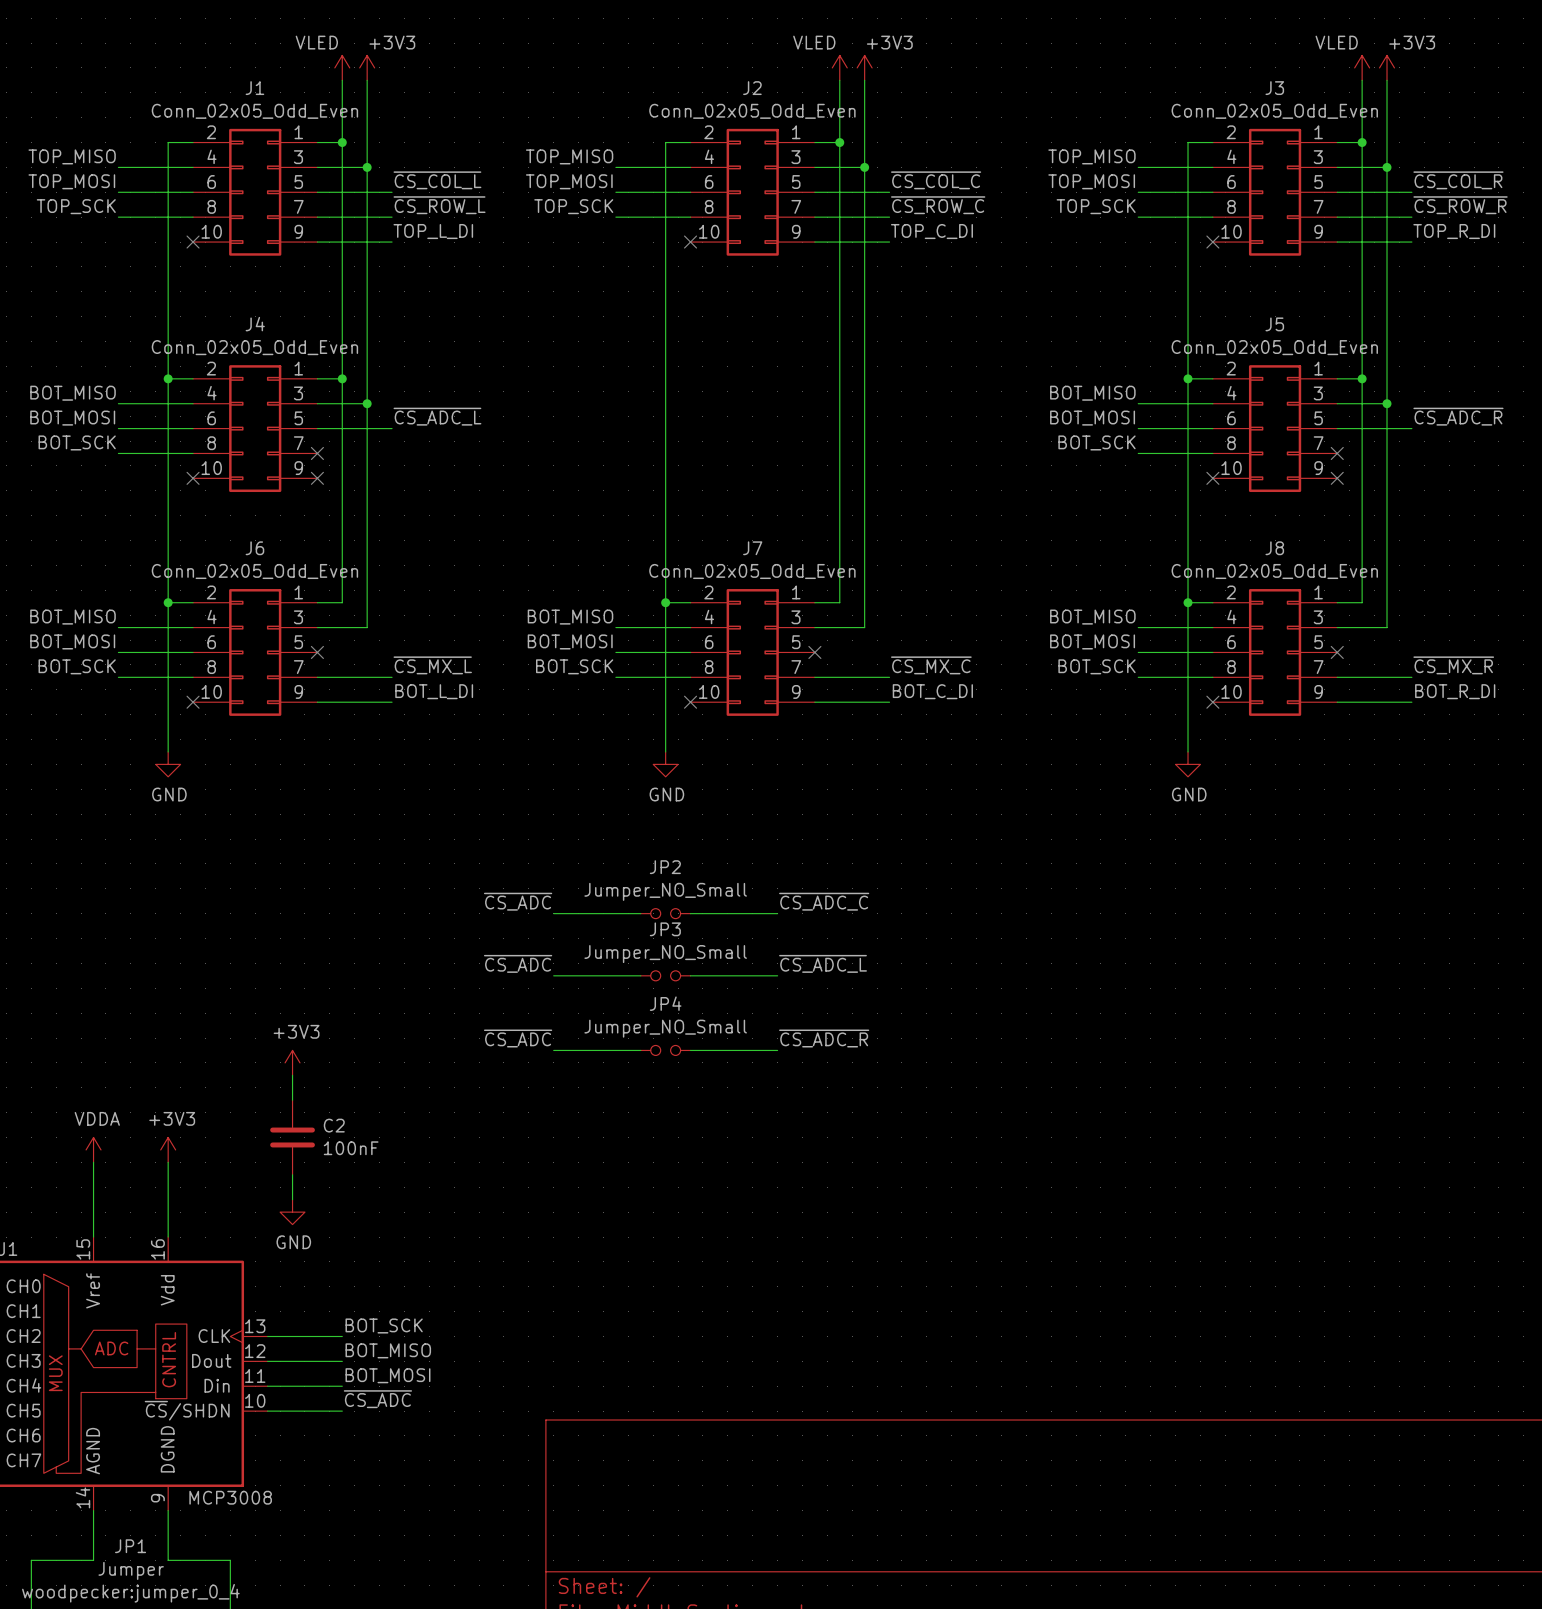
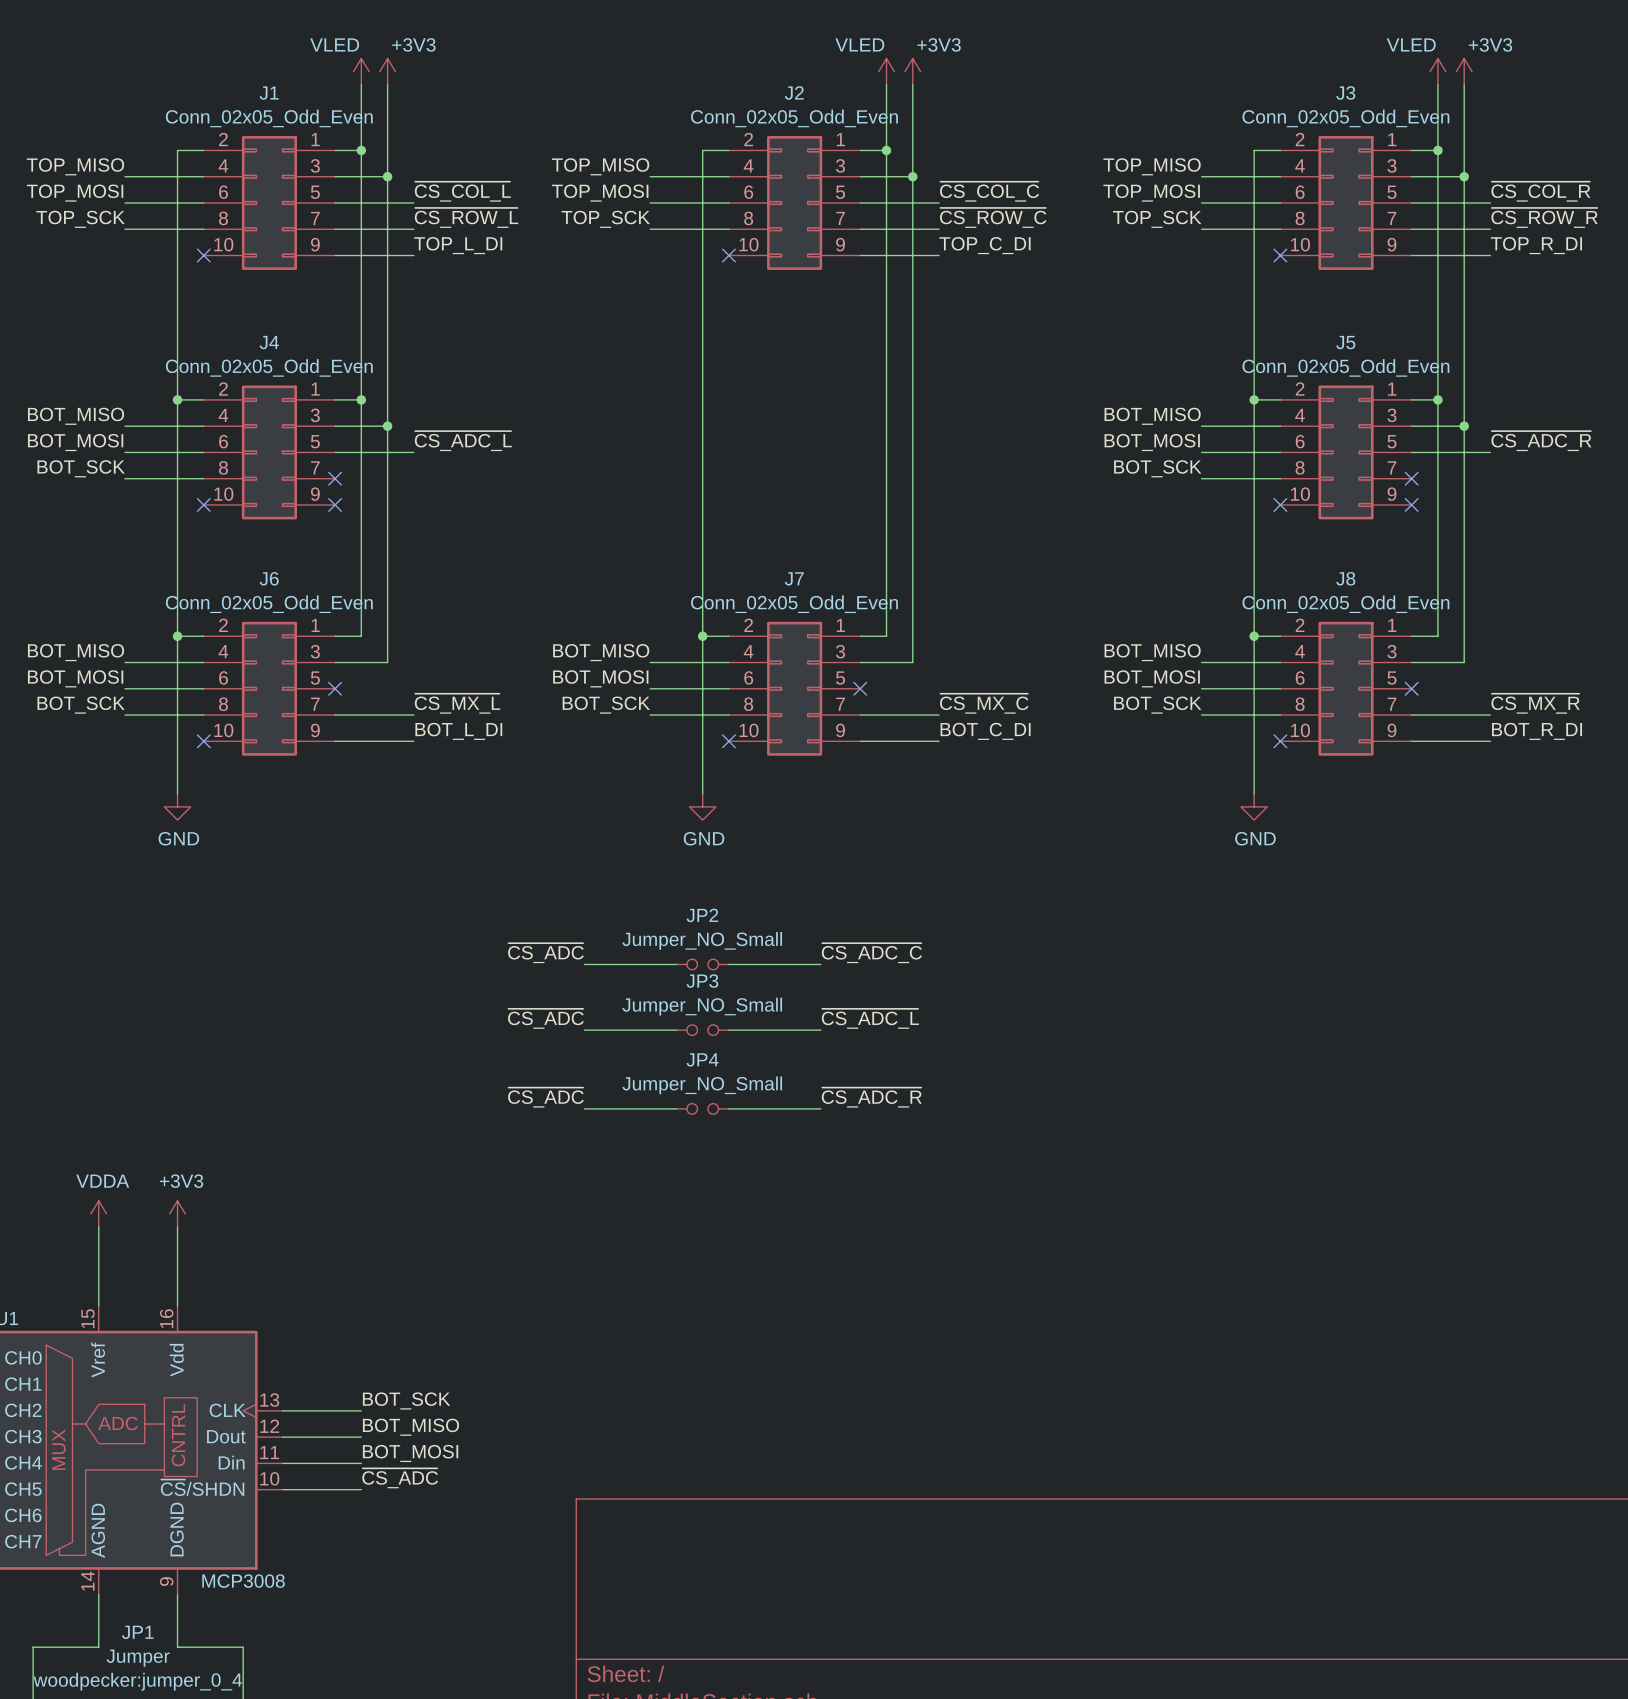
power symbol: +3V3 (292, 1062) -> none
wire: (292, 1075) (292, 1100) -> none
C2: 100nF (292, 1137) -> none
wire: (292, 1174) (292, 1199) -> none
power symbol: GND (292, 1212) -> none

